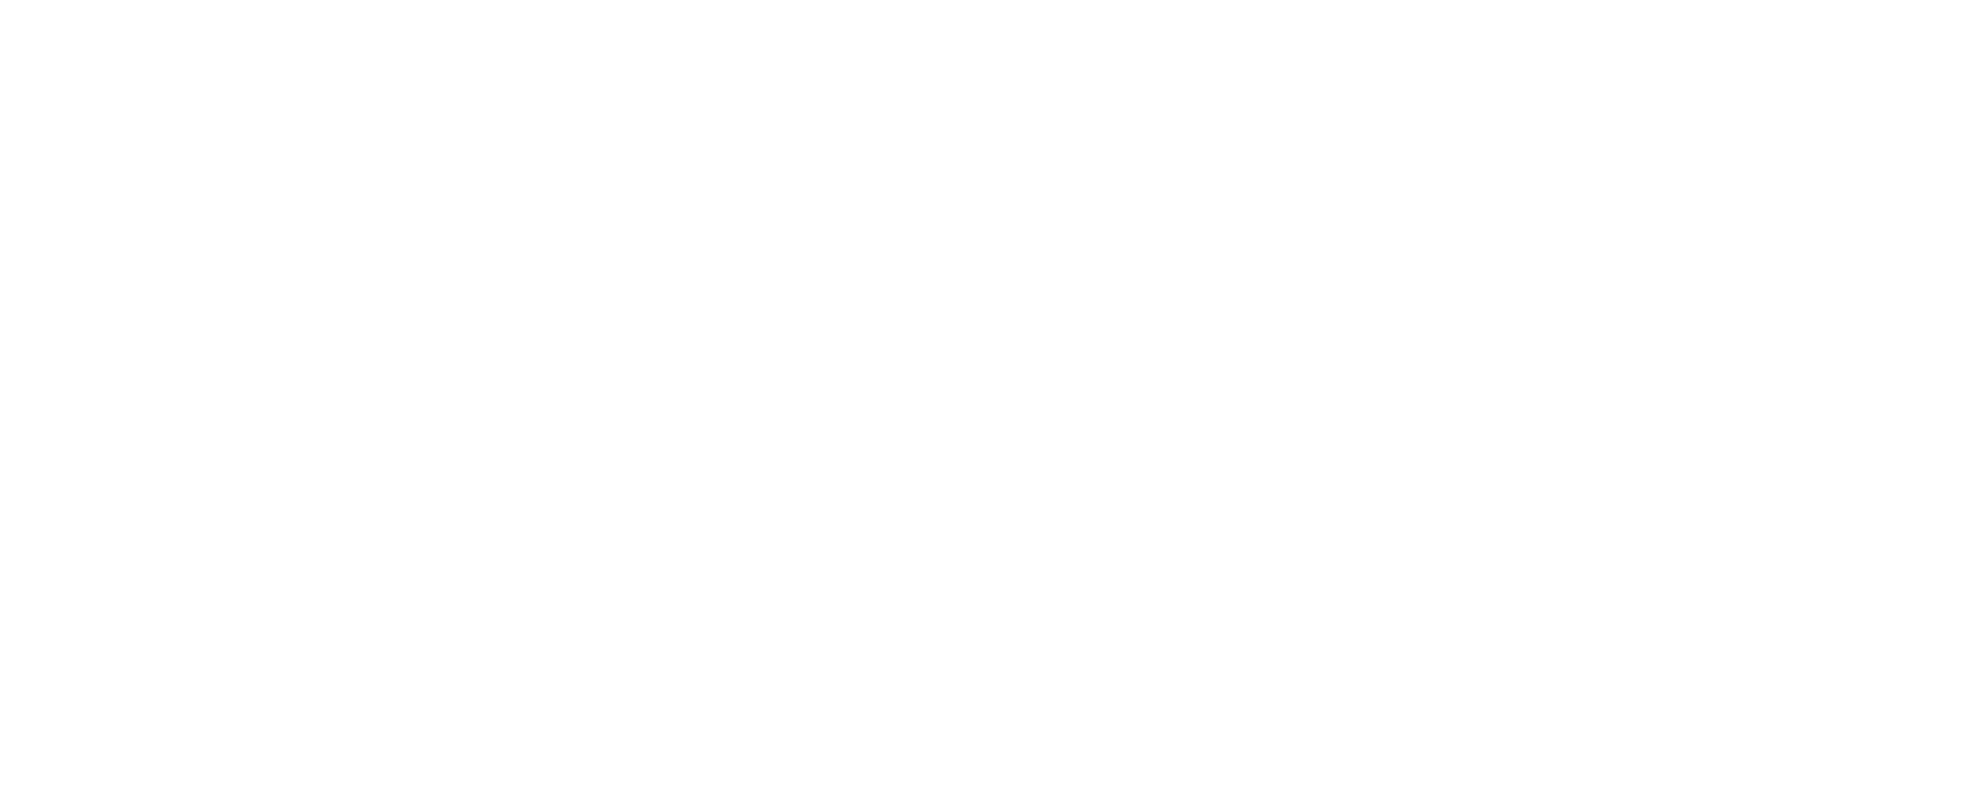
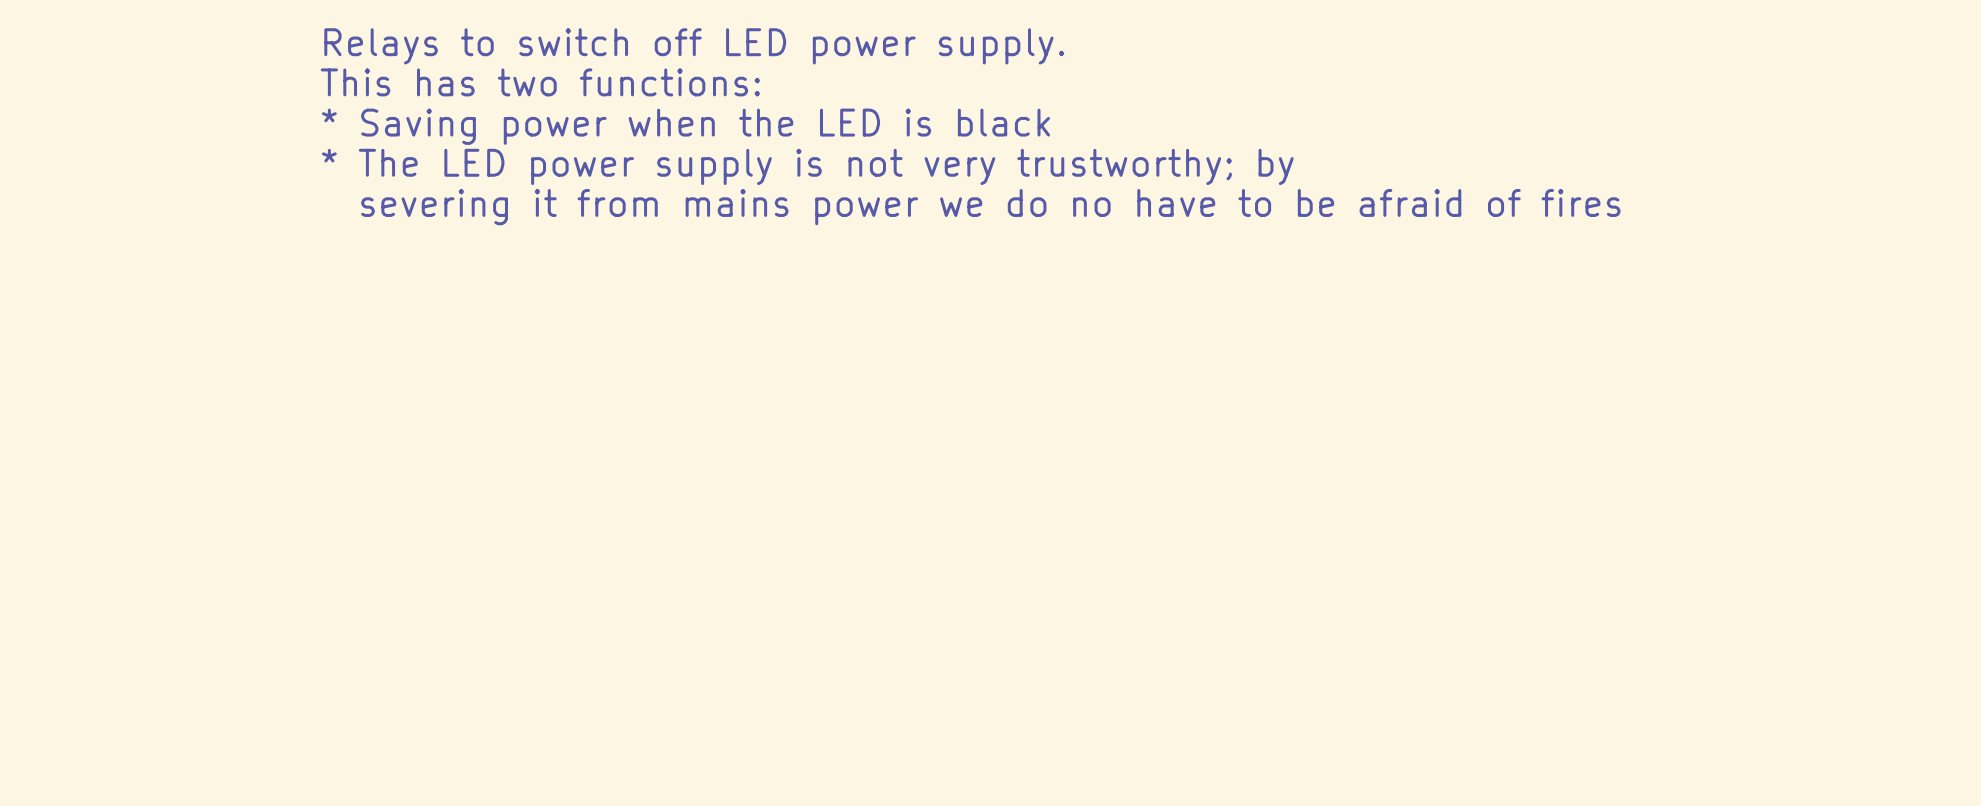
text: none -> Relays to switch off LED power supply. (694, 46)
text: none -> This has two functions: (540, 82)
text: none -> * Saving power when the LED is black (685, 126)
text: none -> * The LED power supply is not very trustworthy; by (807, 166)
text: none -> severing it from mains power we do no have to be afraid of fires (990, 207)

